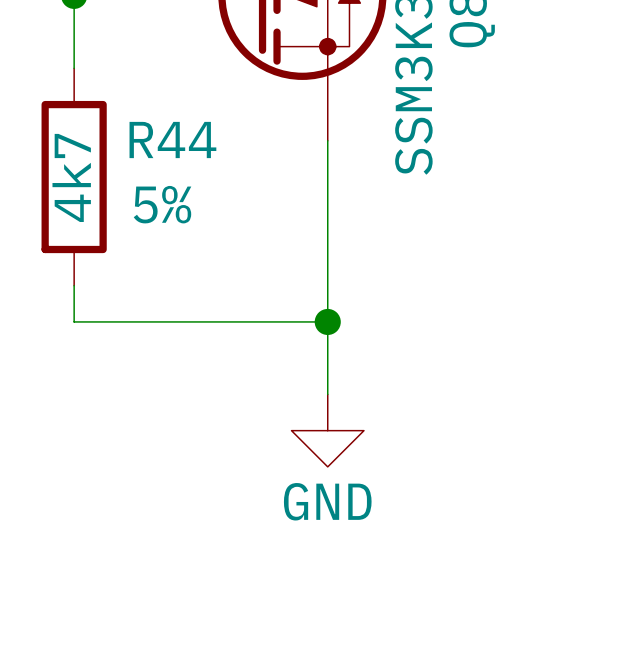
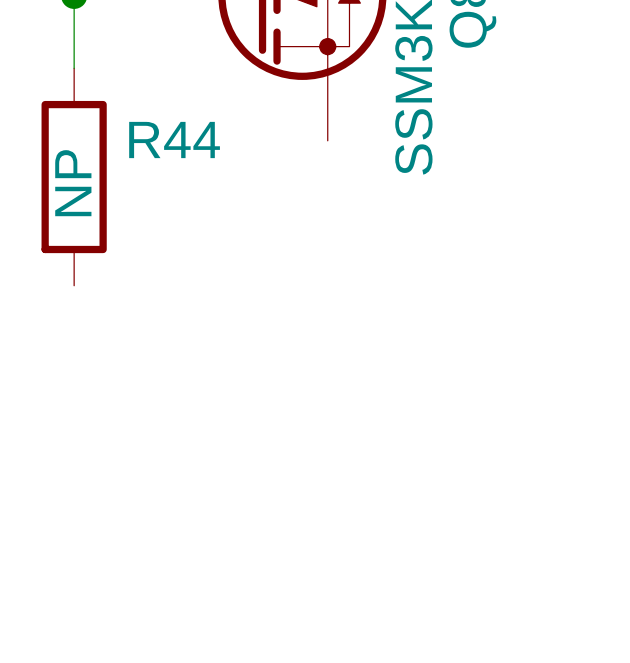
wire: (327, 140) (327, 394) -> none
R44 text: 4k7 (71, 177) -> none
R44 text: none -> NP (73, 183)
R44 text: 5% (162, 204) -> none
wire: (74, 285) (74, 321) (327, 321) -> none
junction: (327, 321) -> none
power symbol: GND (327, 430) -> none

